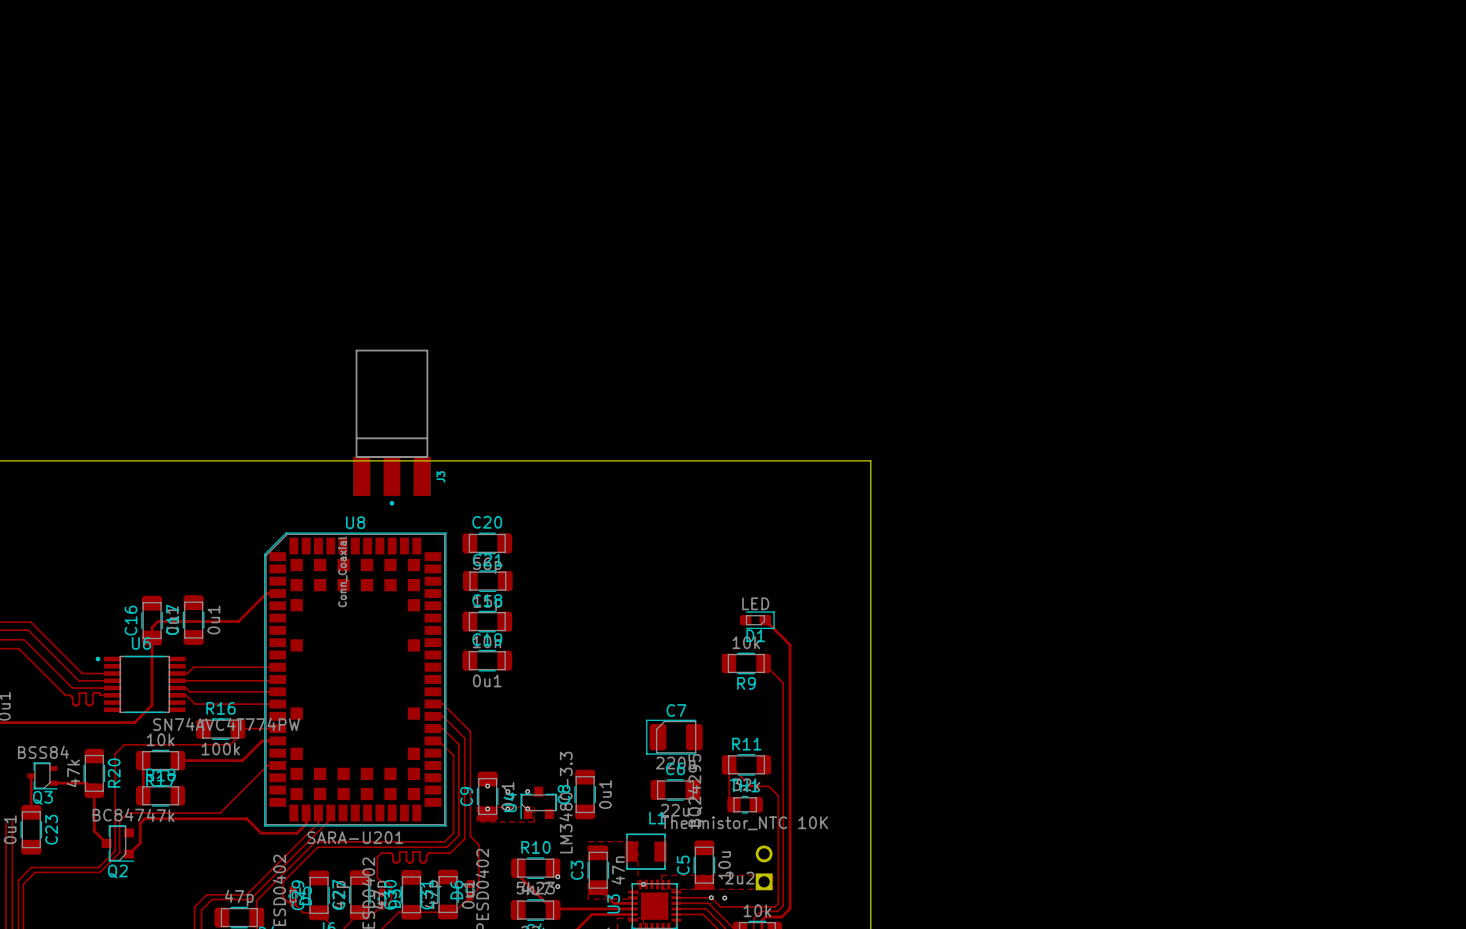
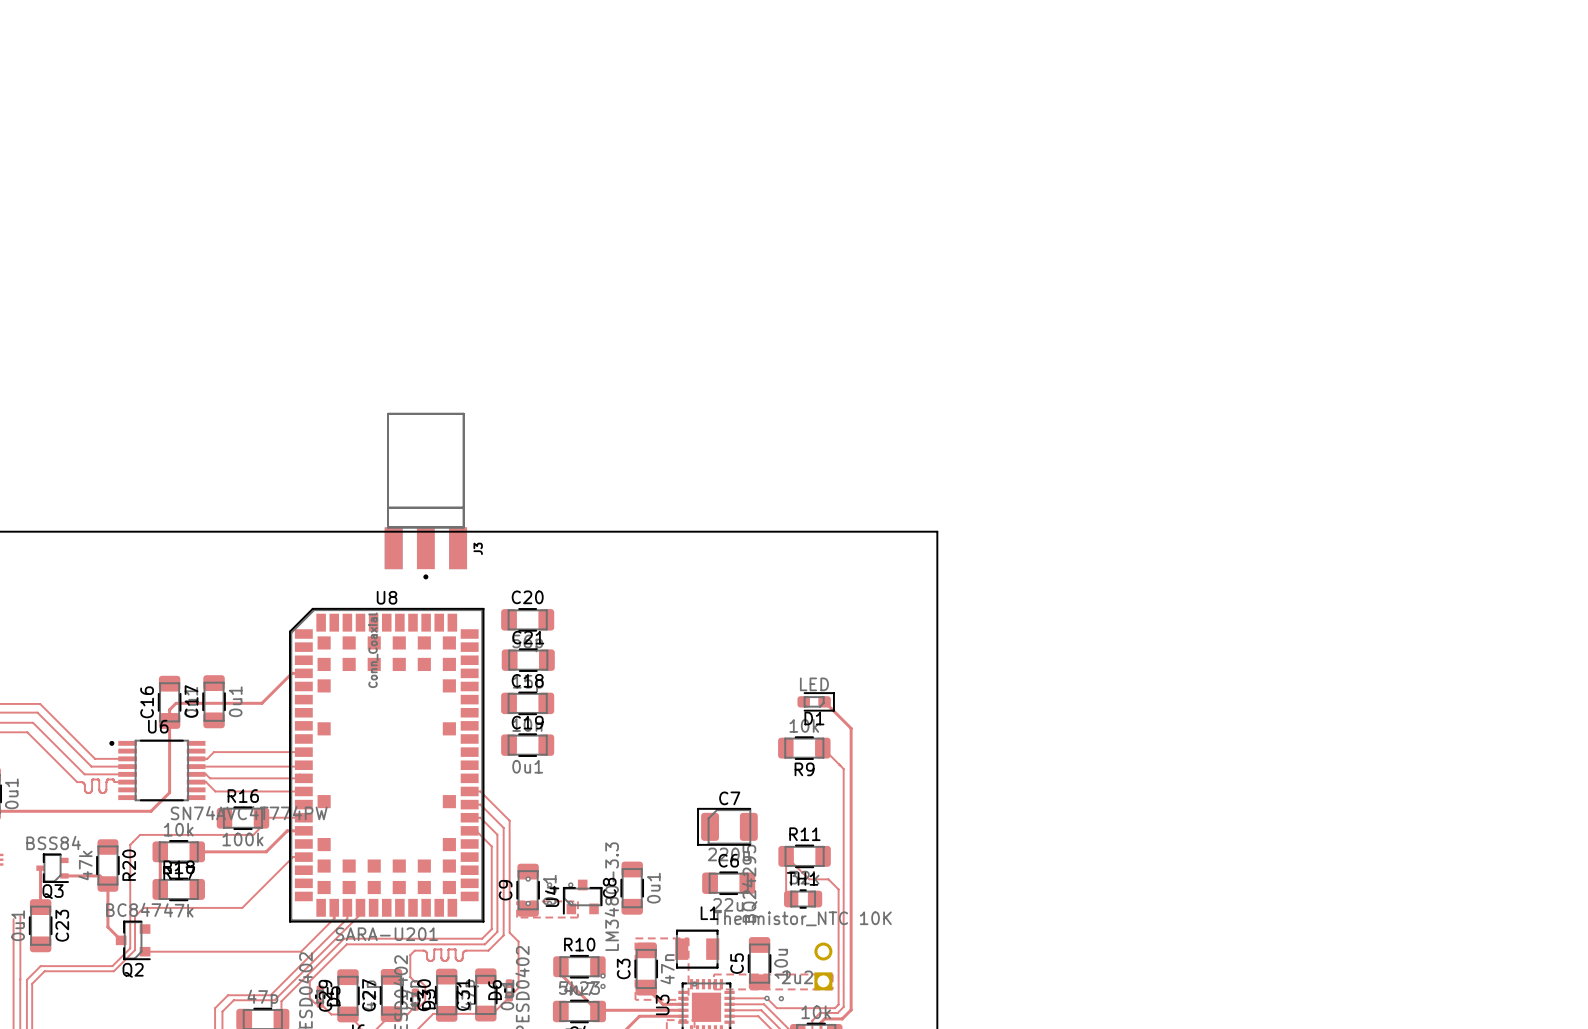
top track: (306, 823) (297, 833) (261, 833) (246, 818) (144, 818) (140, 823) (140, 843) (129, 854) -> (334, 918) (301, 951) (145, 951)

